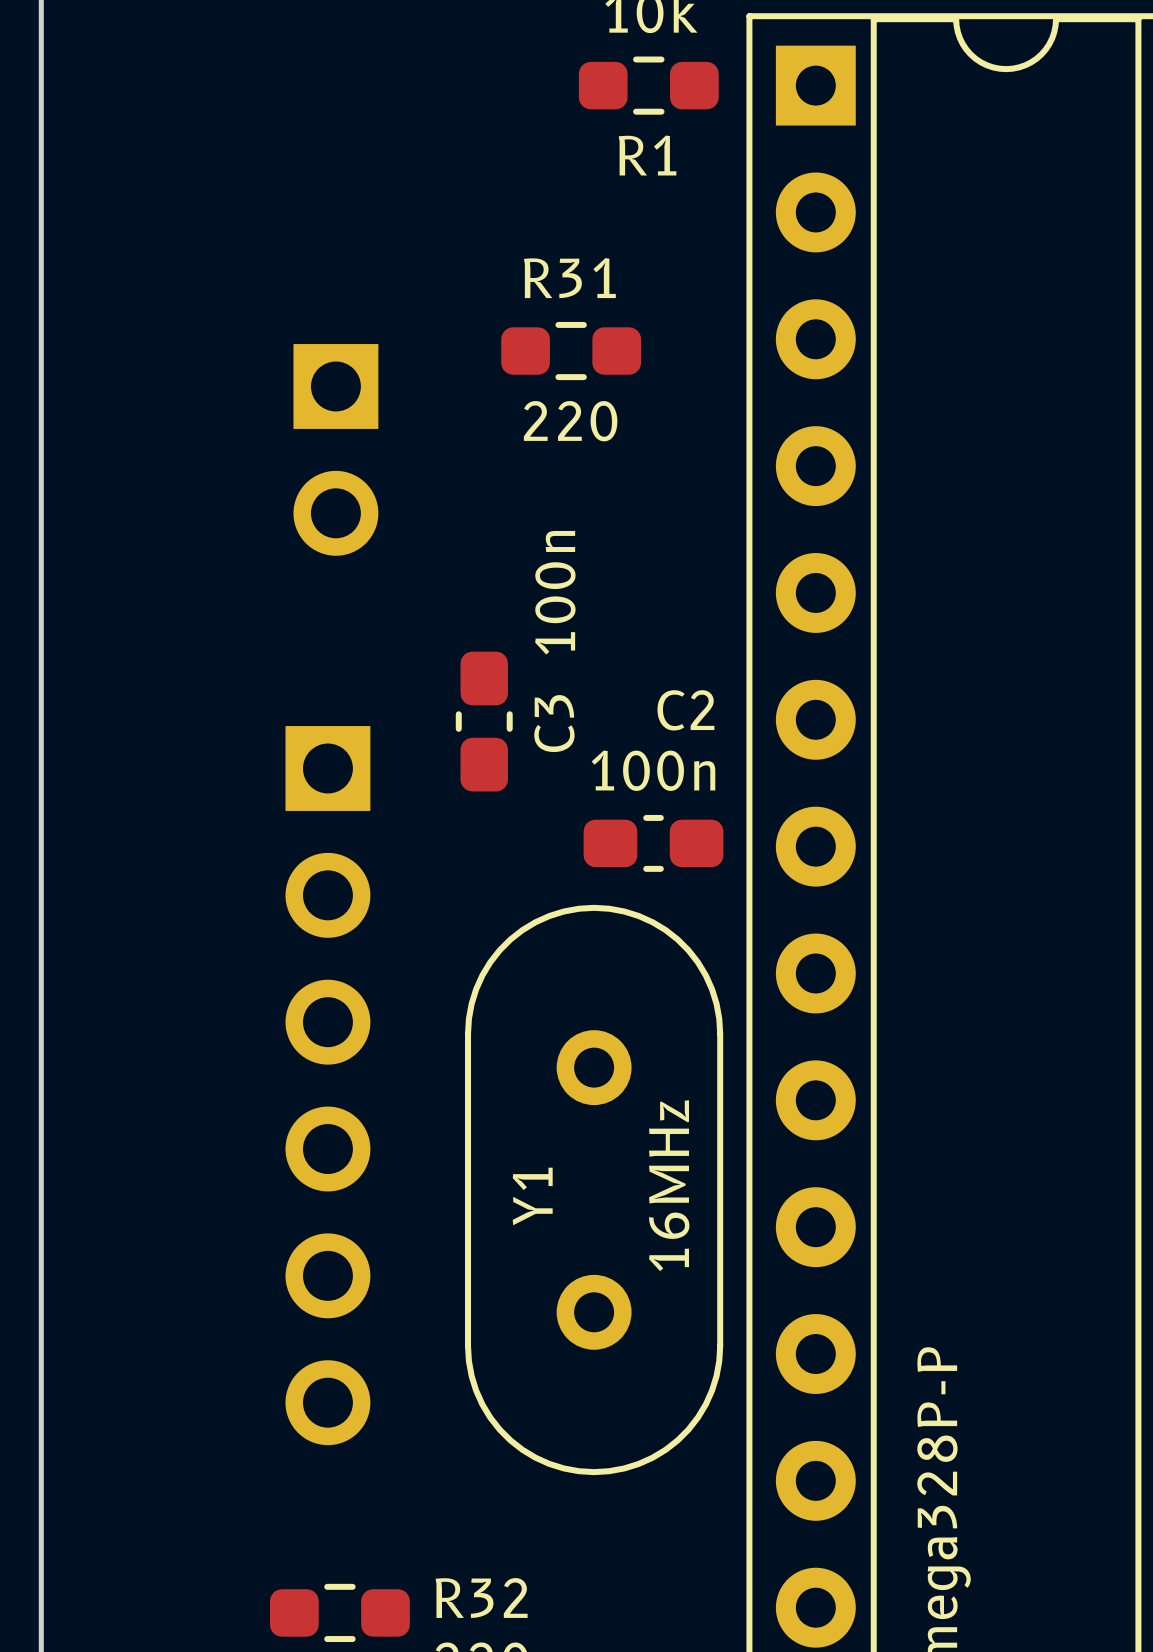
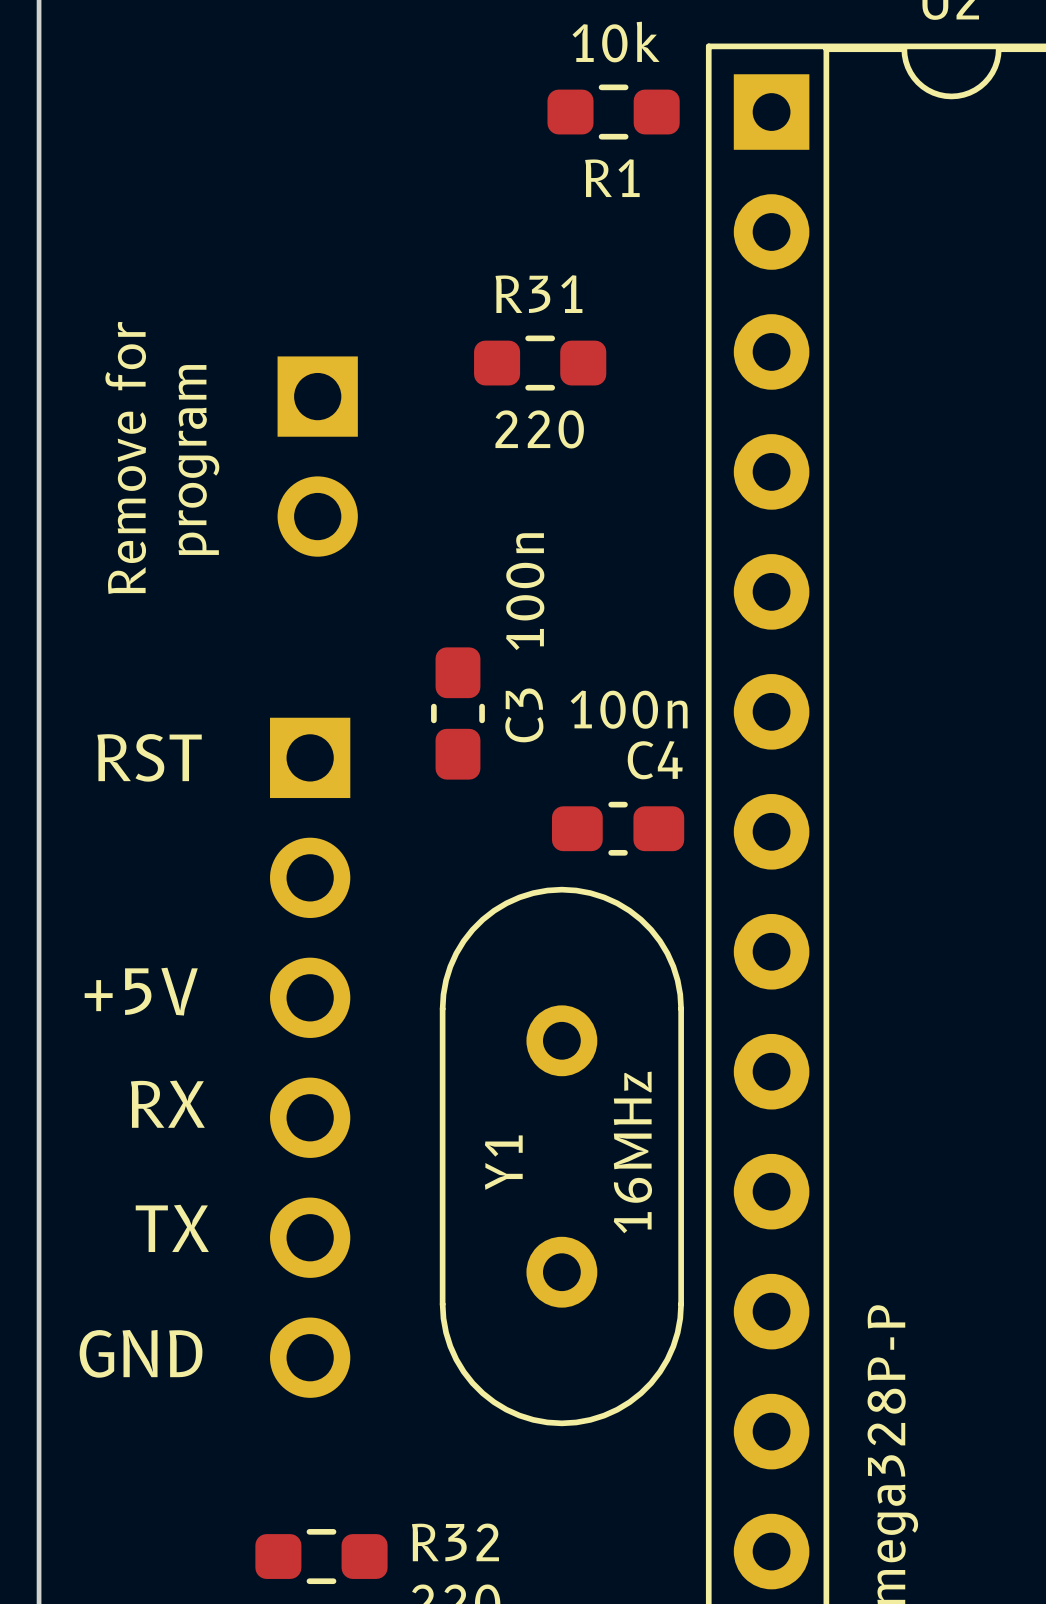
text: none -> Remove for (125, 457)
text: none -> program (198, 459)
C2 name: C2 (685, 710) -> C4 (655, 760)
text: none -> RST (149, 757)
C2 value position: 100n (653, 770) -> 100n (629, 709)
text: none -> +5V (141, 991)
text: none -> RX (167, 1104)
text: none -> TX (172, 1228)
text: none -> GND (141, 1353)

